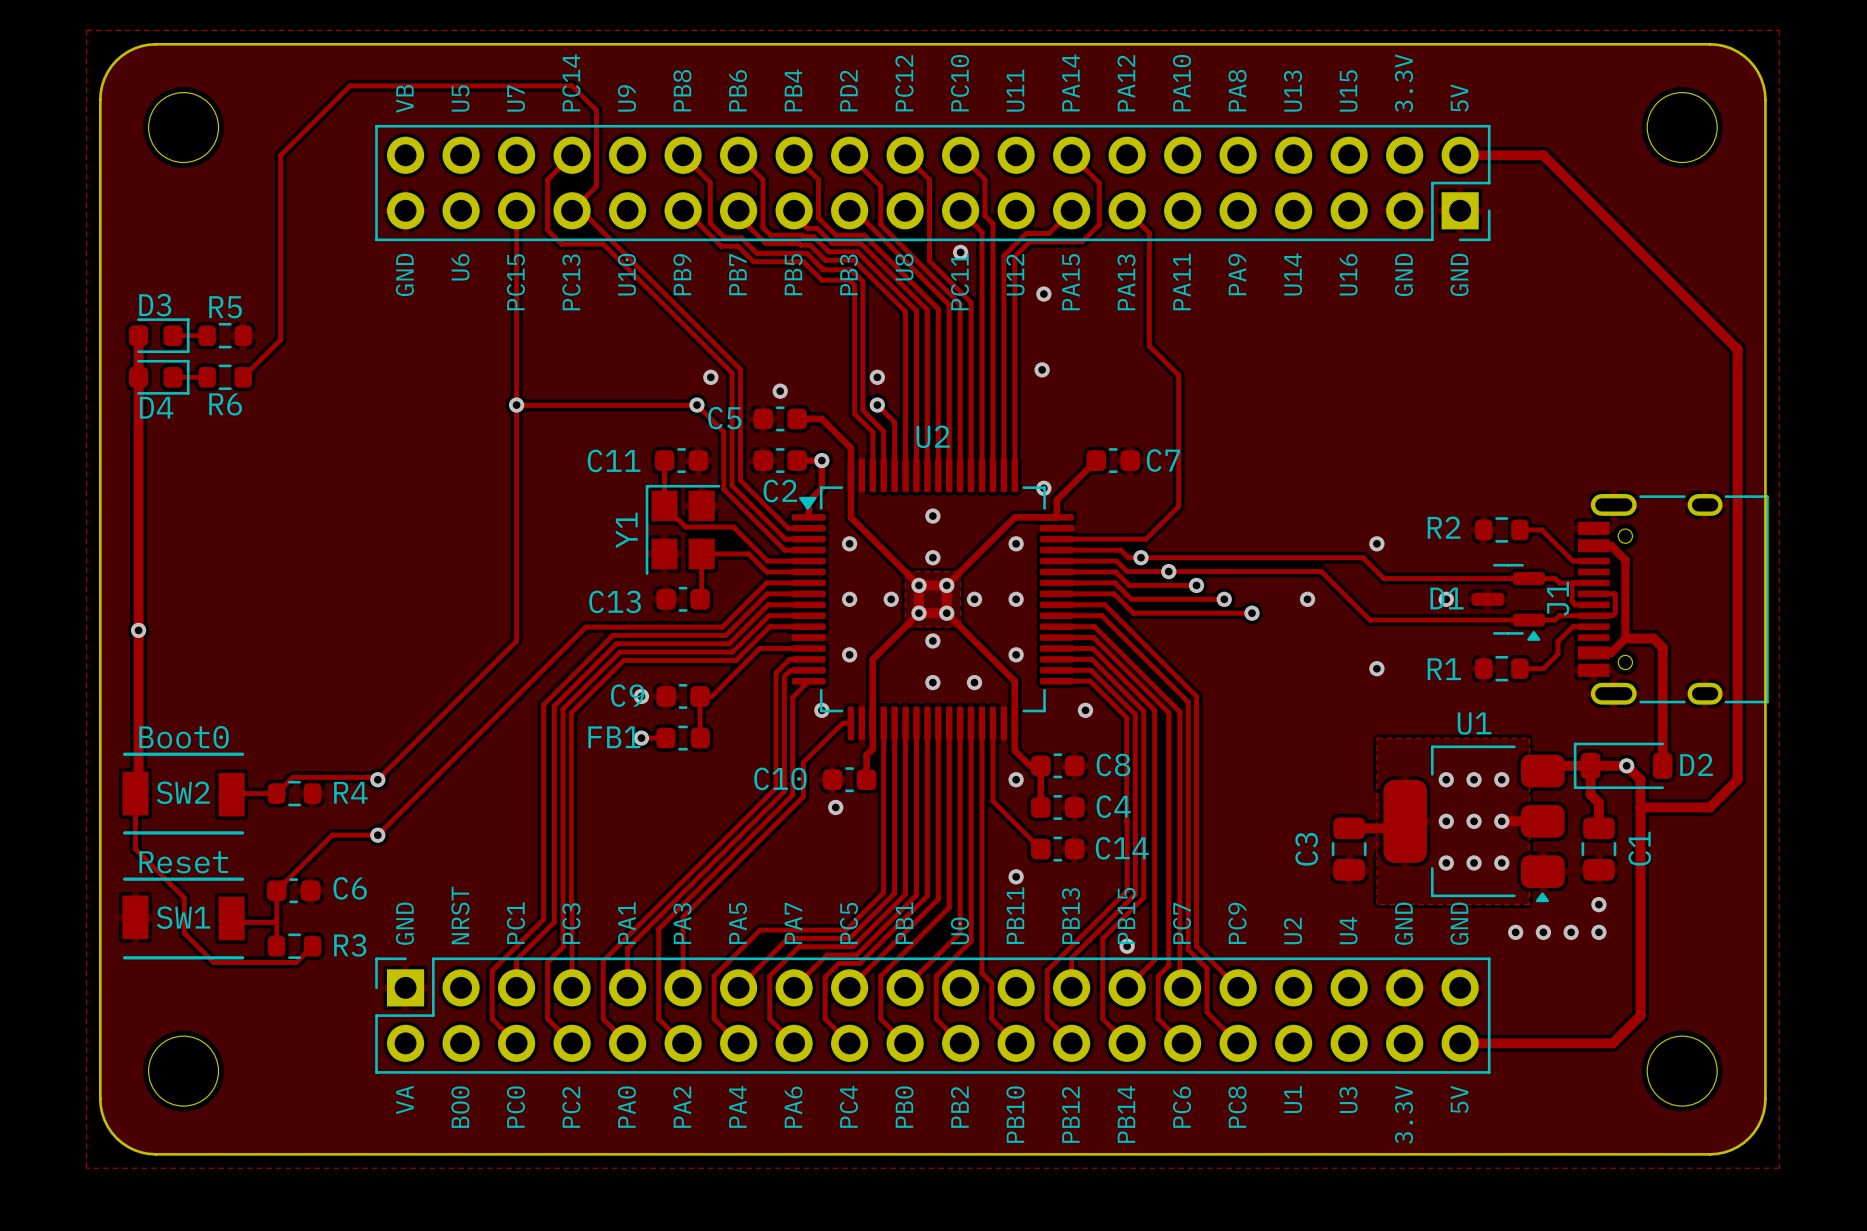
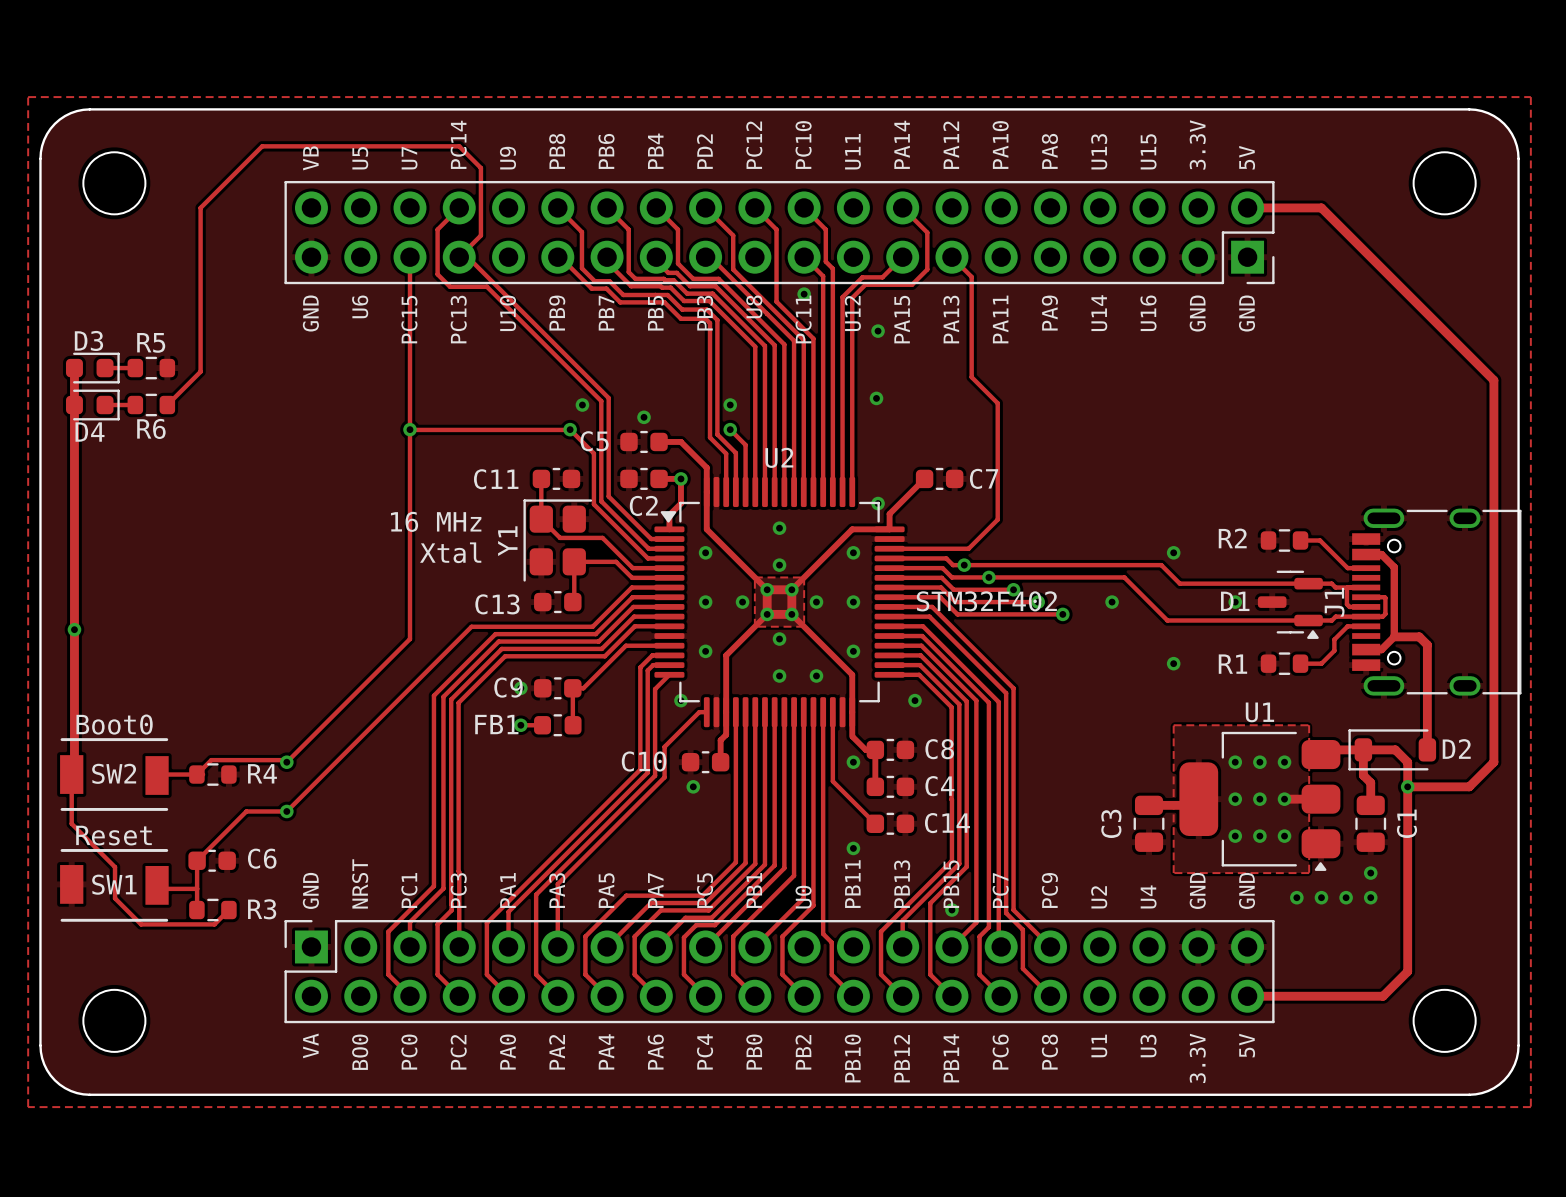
Y1 footprint: [645, 484, 721, 575] -> [523, 499, 593, 582]
text: none -> 16 MHz (436, 521)
text: none -> Xtal (450, 552)
text: none -> STM32F402 (986, 601)
via position: (1626, 765) -> (1407, 786)

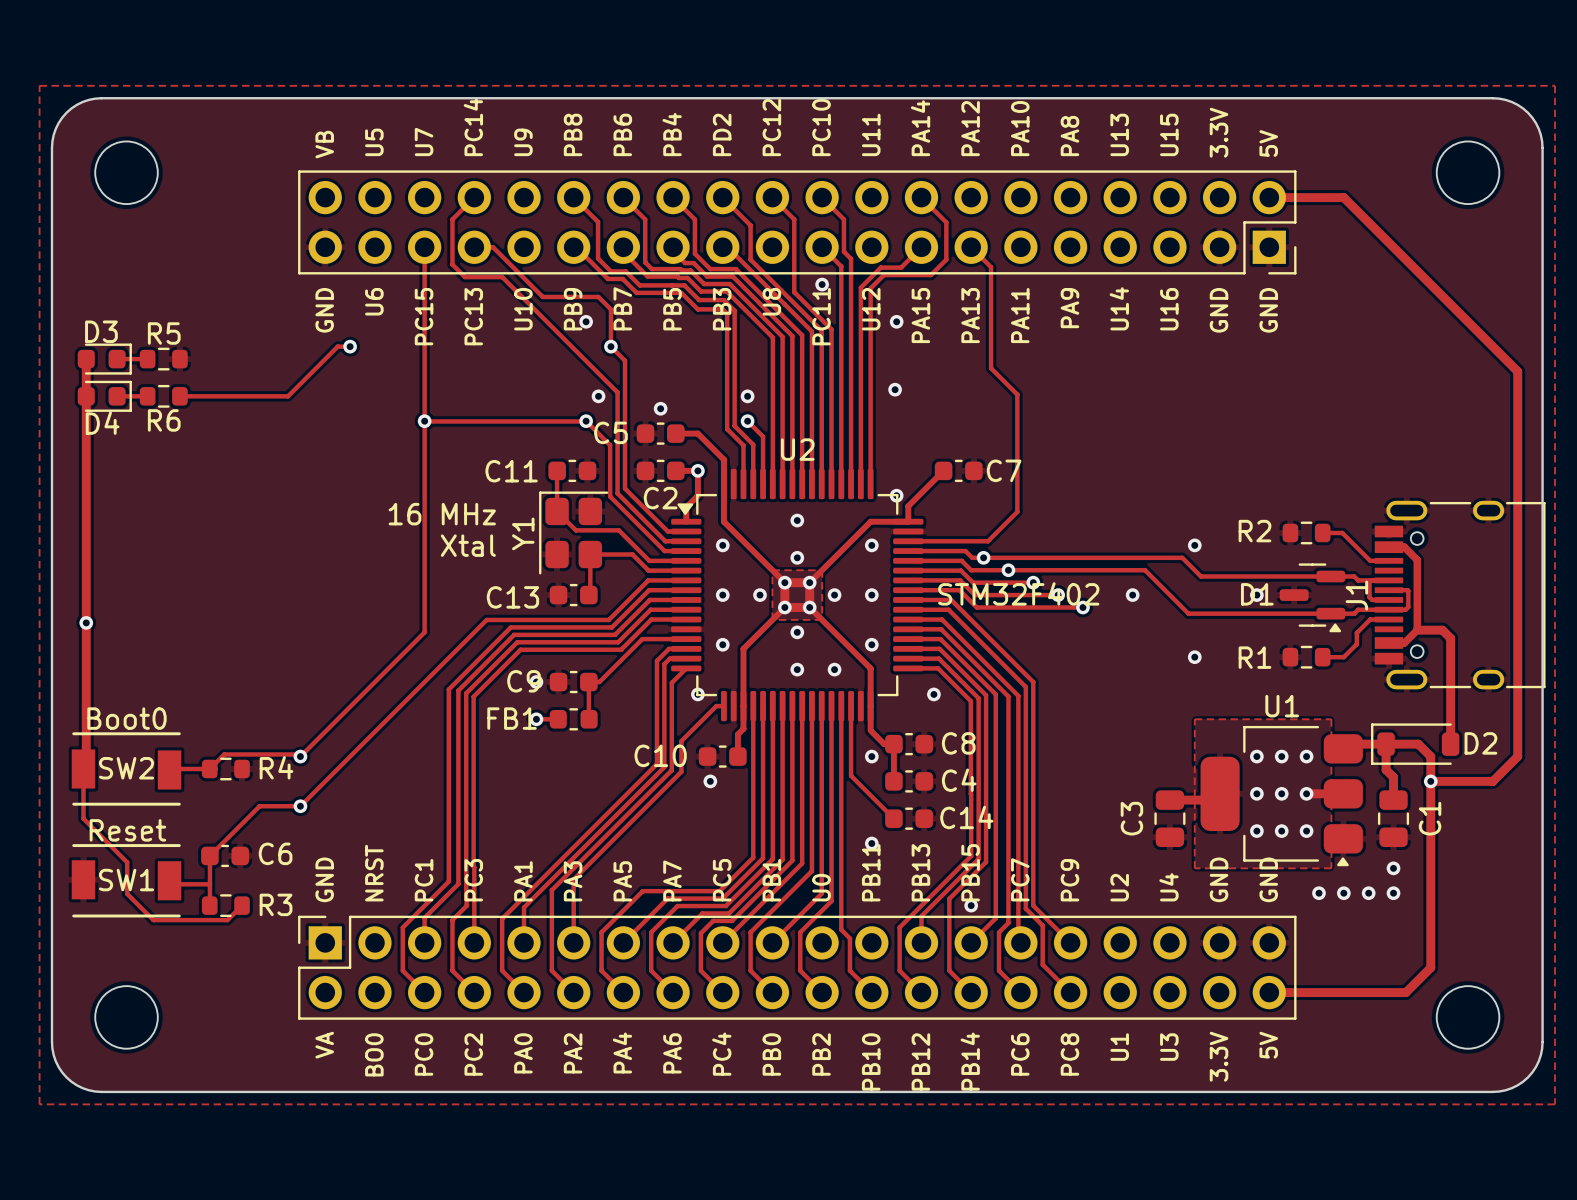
track: (459, 257) (480, 235) (480, 168) (459, 146) (262, 146) (200, 207) (200, 371) (167, 405) -> (350, 346) (337, 346) (288, 396) (179, 396)
track: (467, 257) (608, 398) -> (474, 247) (493, 247) (542, 296) (598, 296) (610, 309) (610, 346) (625, 360) (625, 389)
via: none -> (586, 321)
via: none -> (350, 346)
via: none -> (610, 346)

